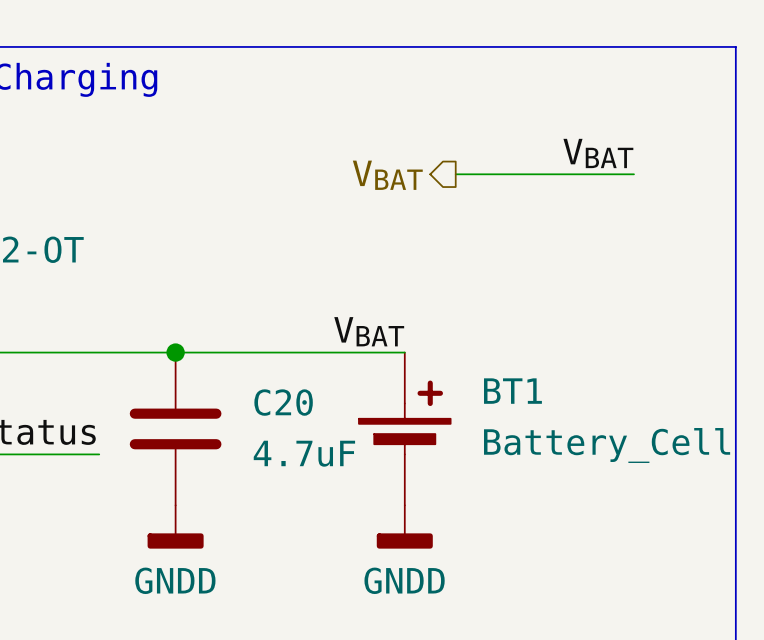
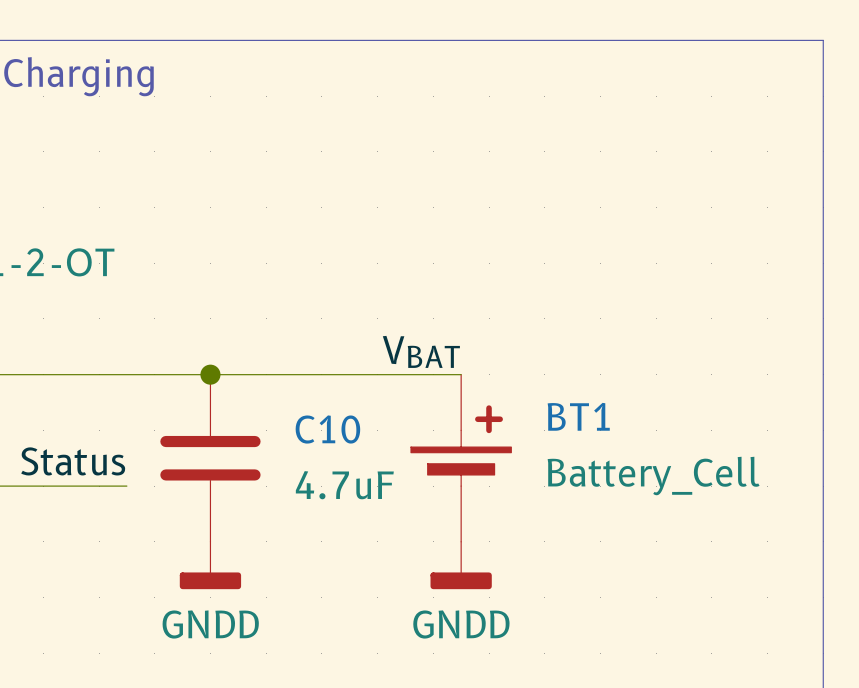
label: VBAT (598, 153) -> none
wire: (455, 174) (633, 174) -> none
hierarchical label: VBAT (387, 175) -> none
C20 name: C20 (283, 402) -> C10 (327, 429)

